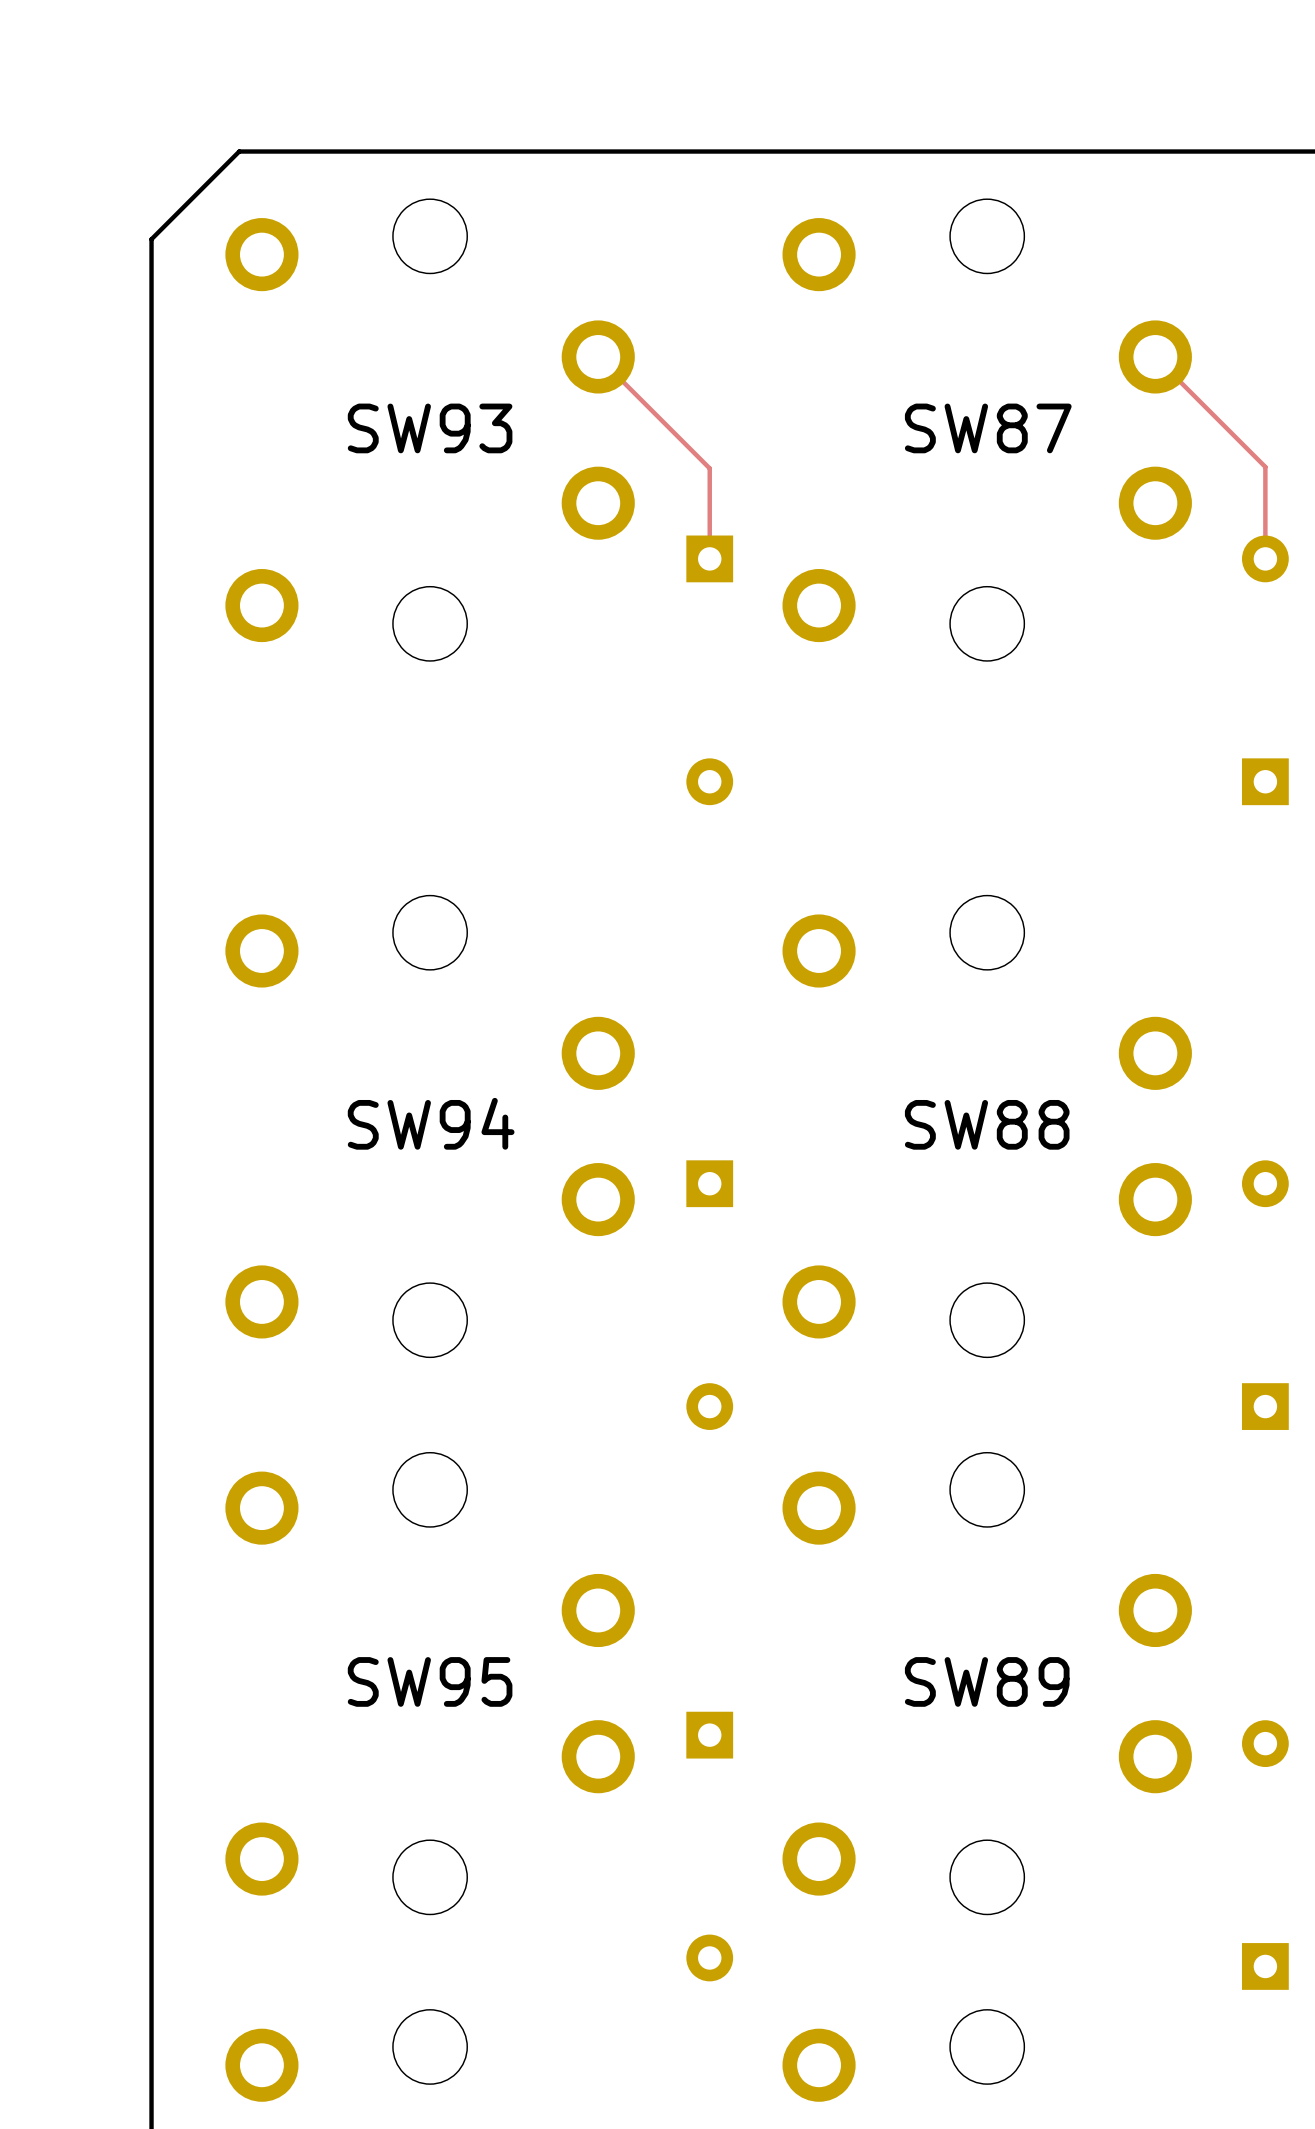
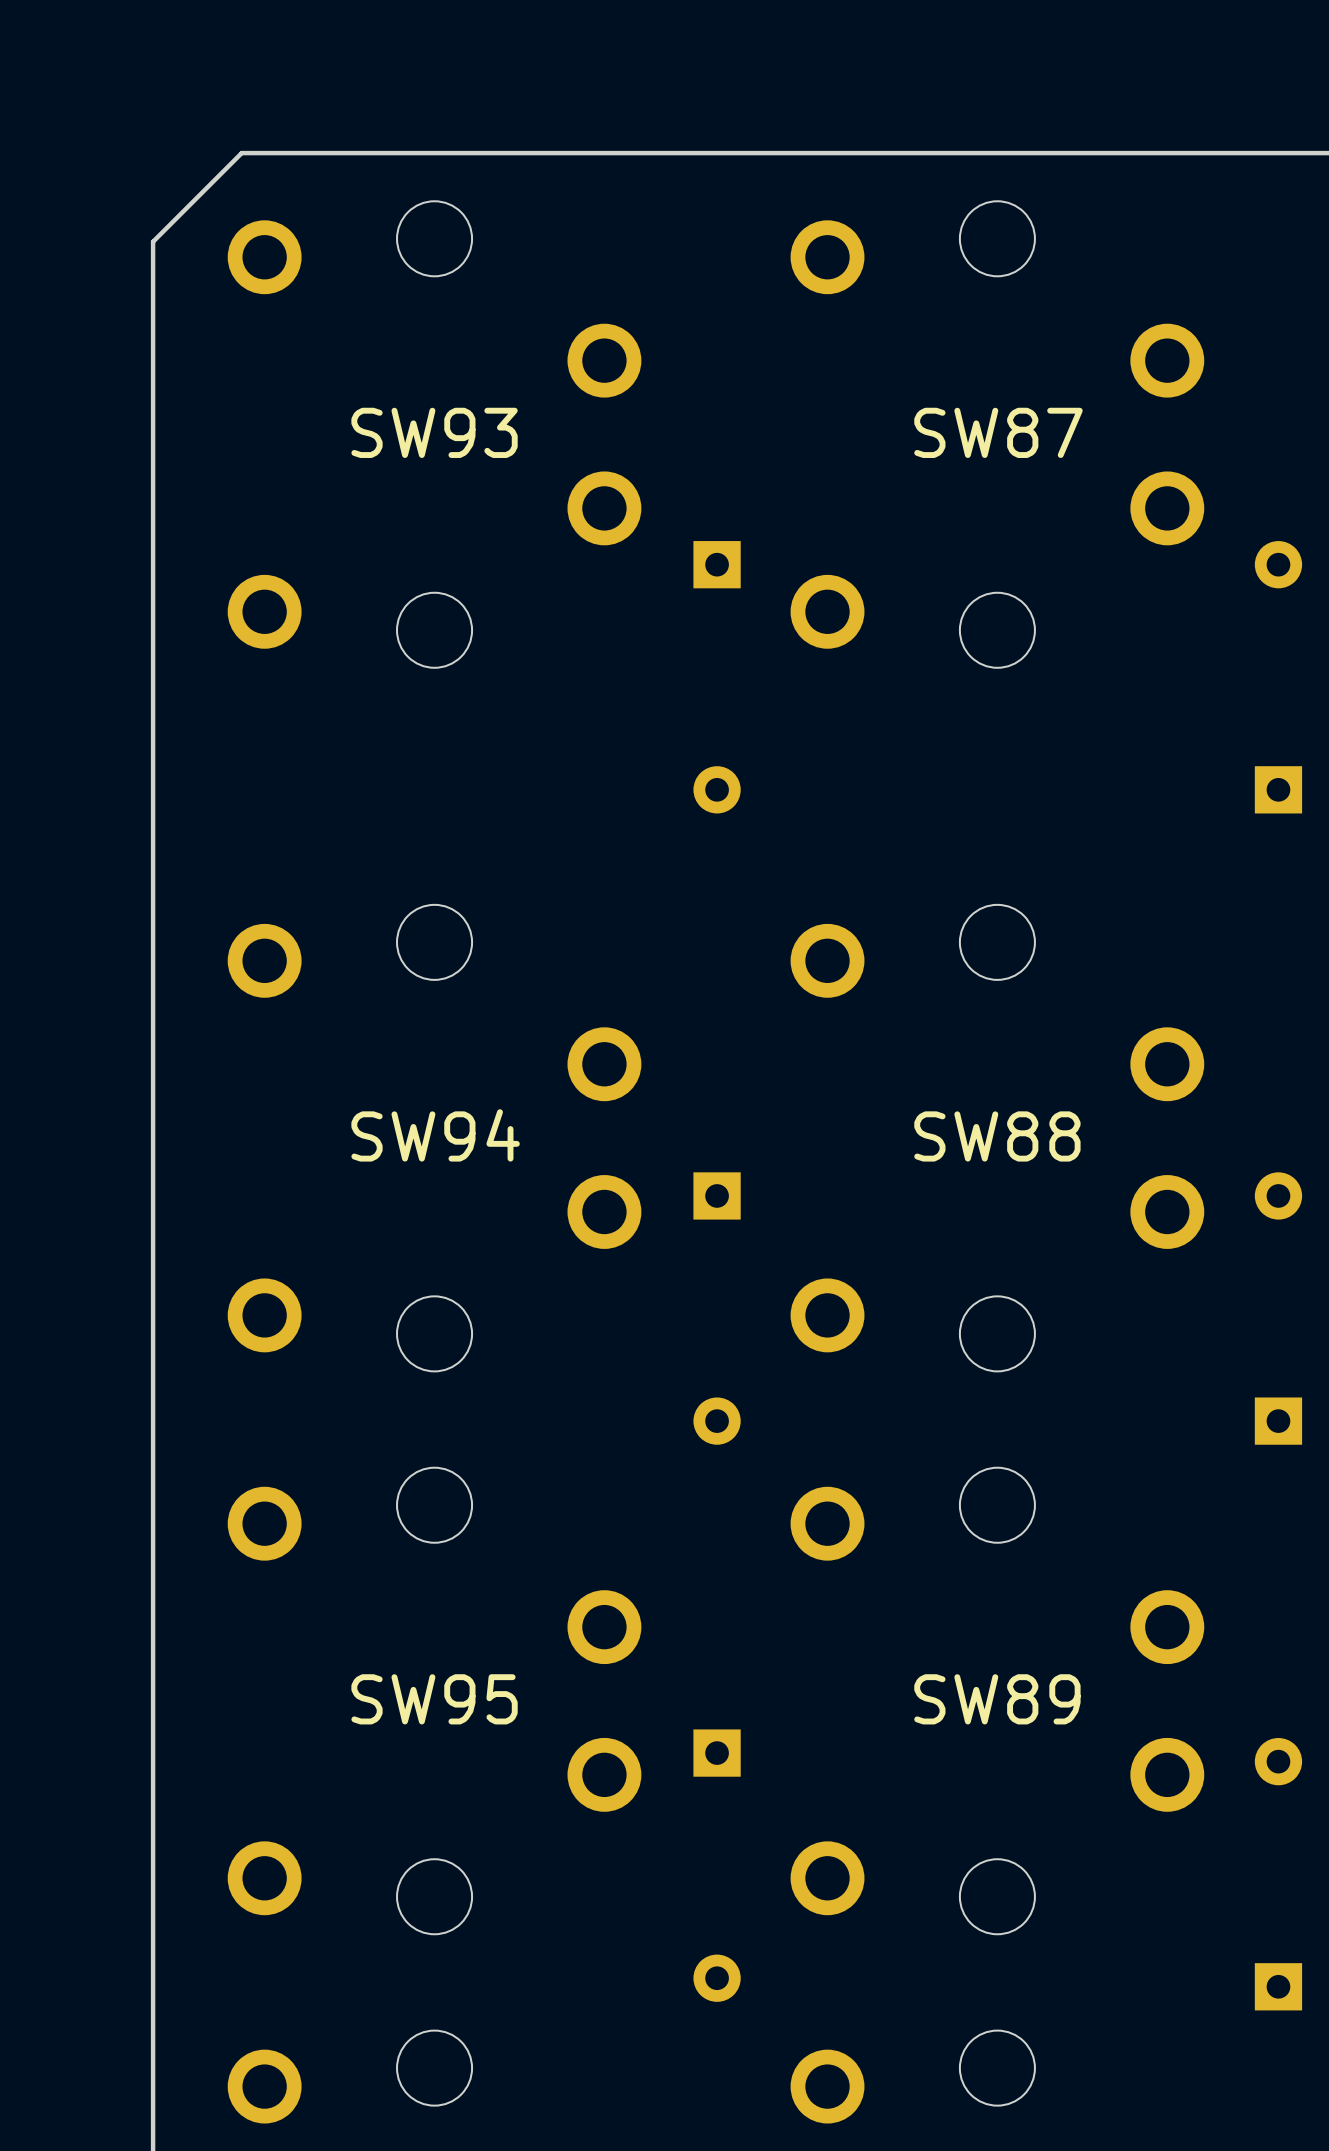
top track: (598, 356) (709, 468) (709, 558) -> none
top track: (1155, 356) (1265, 466) (1265, 558) -> none

